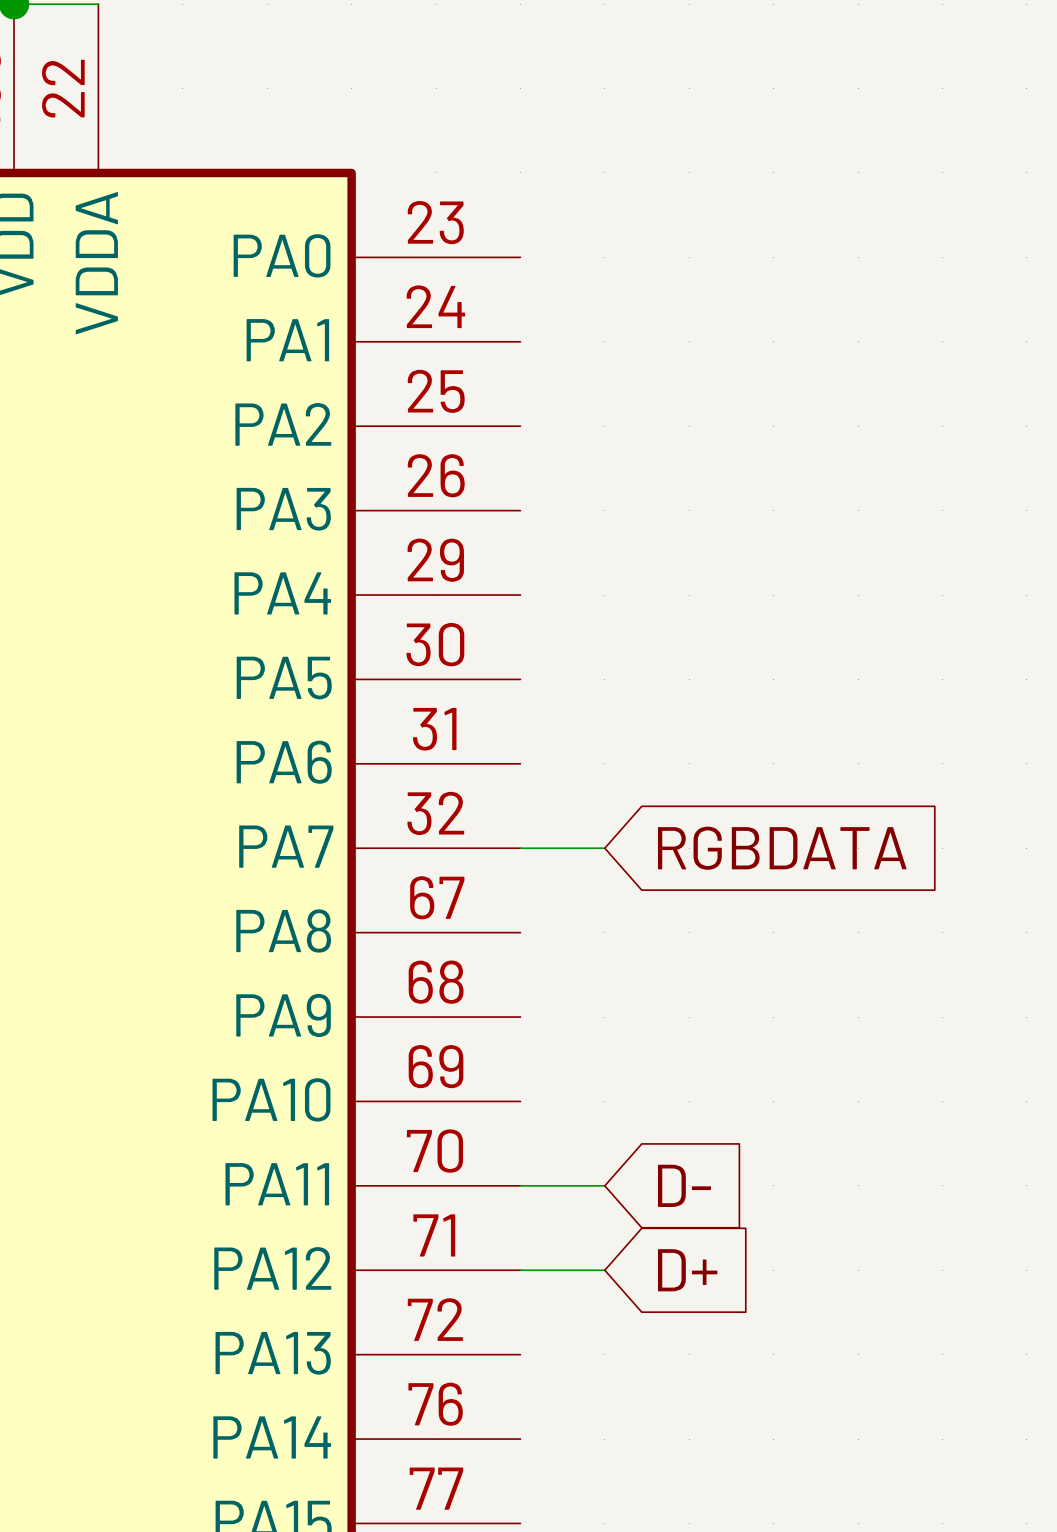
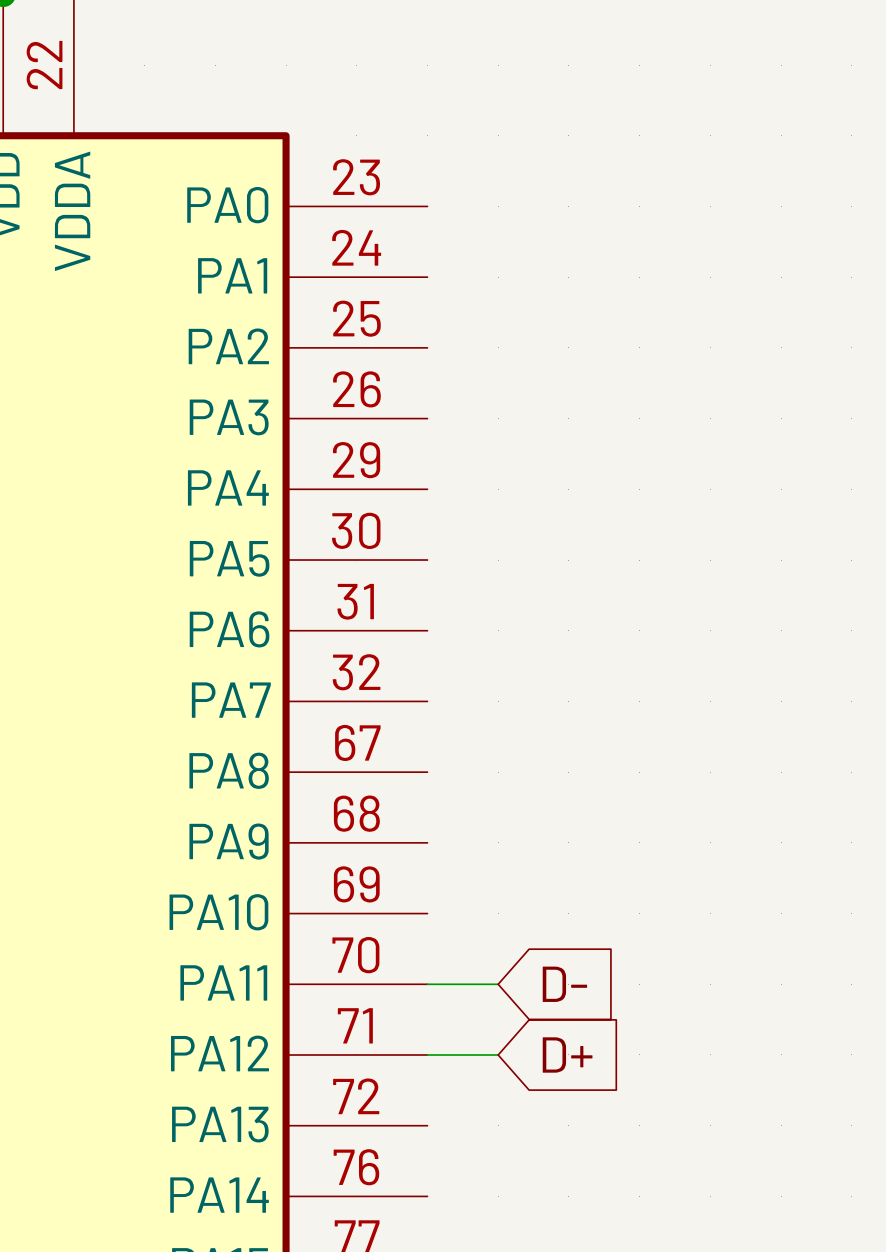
wire: (520, 848) (604, 848) -> none
global label: RGBDATA (782, 848) -> none

